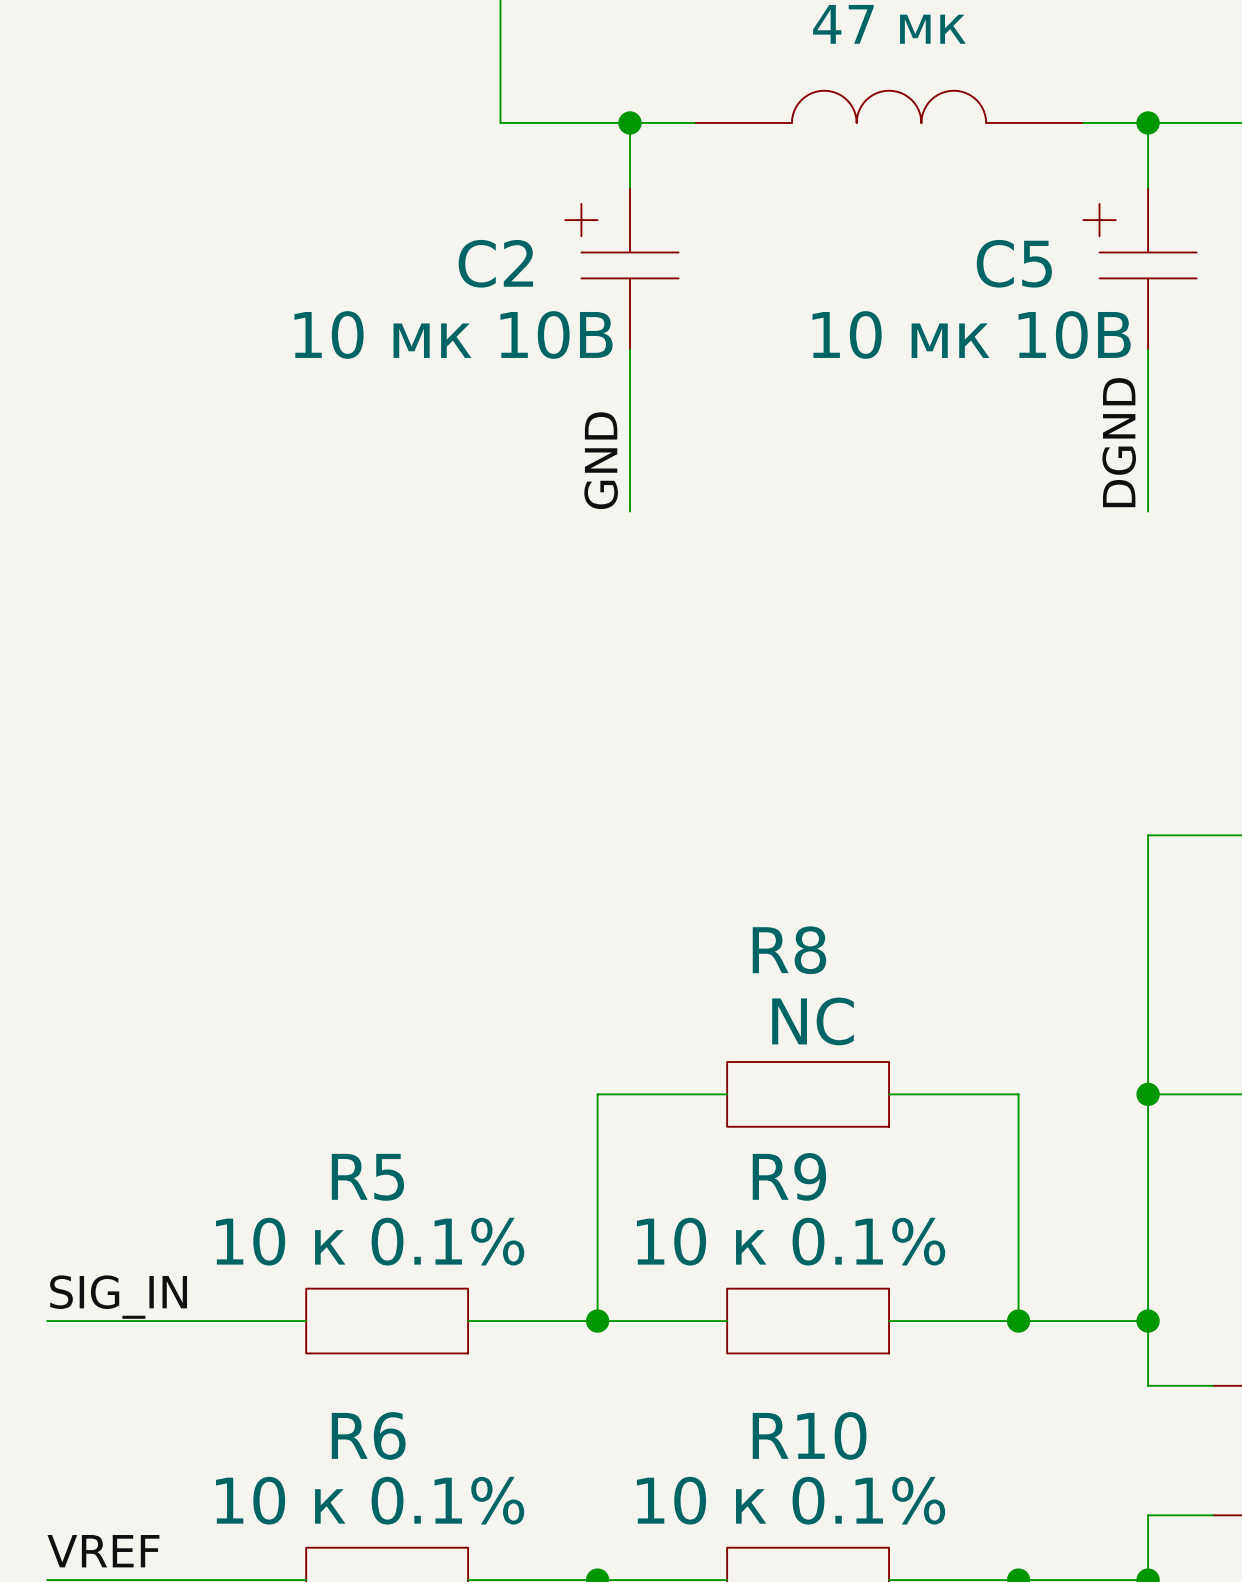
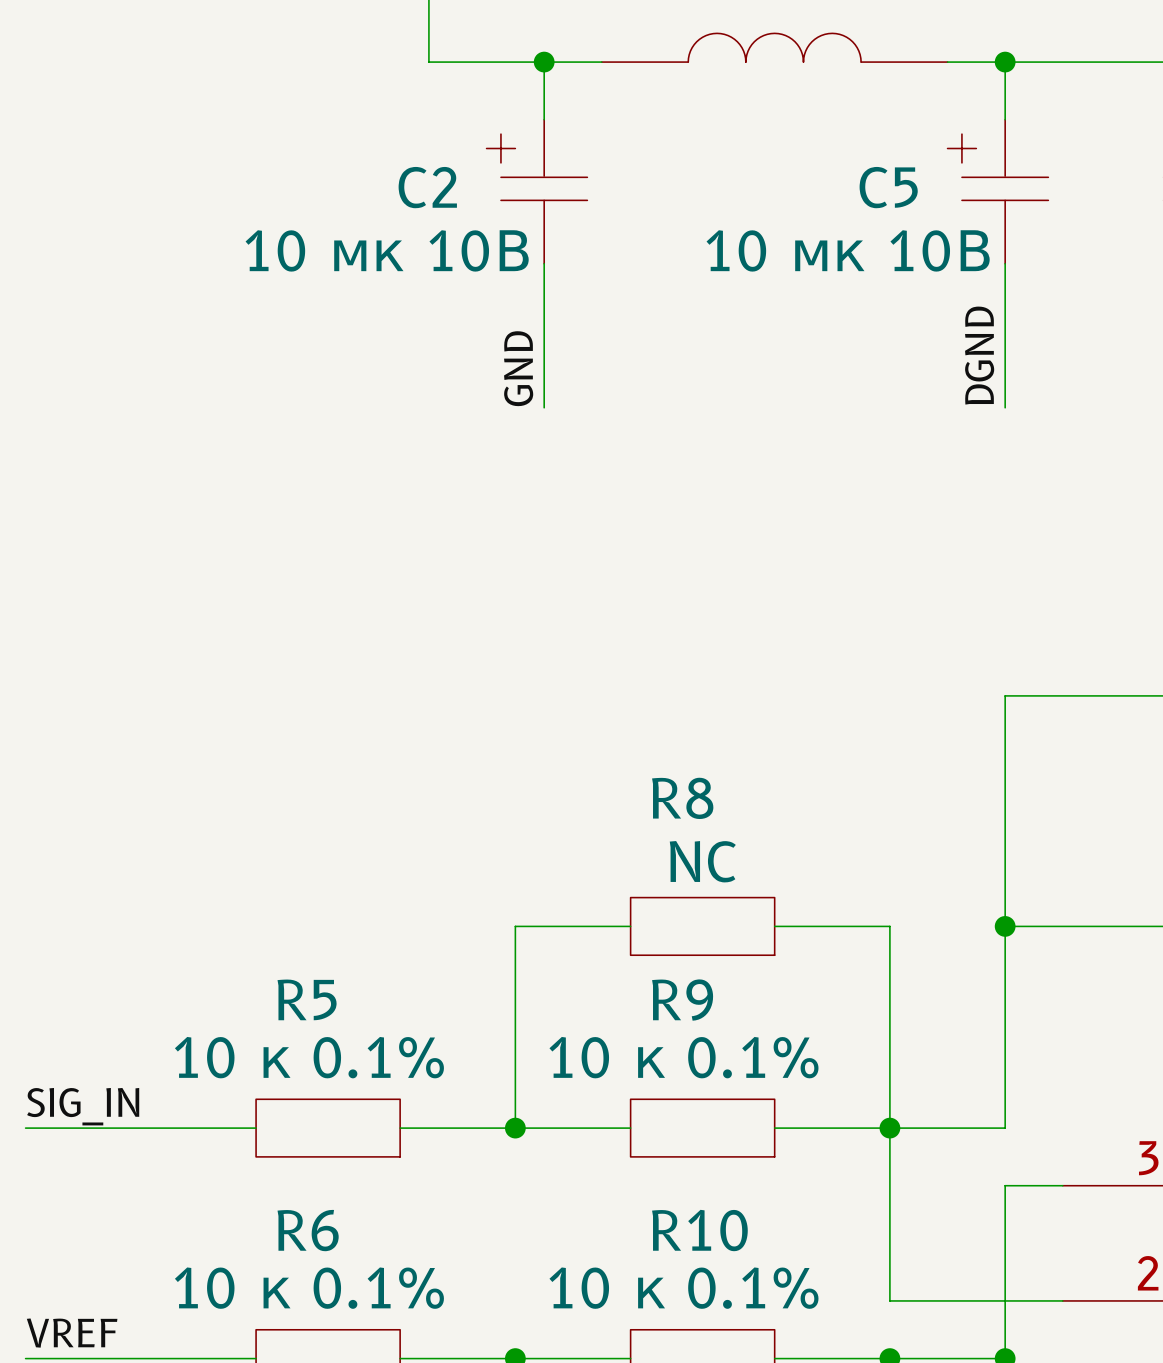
wire: (1148, 1321) (1148, 1385) -> (889, 1128) (889, 1300) (1005, 1300) (1005, 1185)
junction: (1148, 1321) -> none

